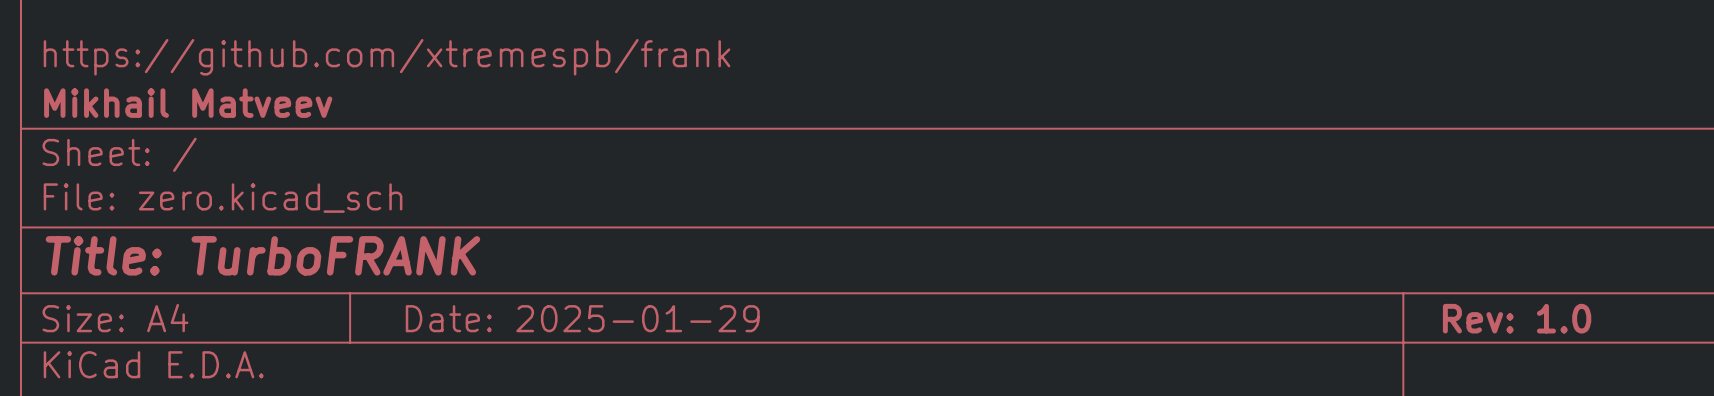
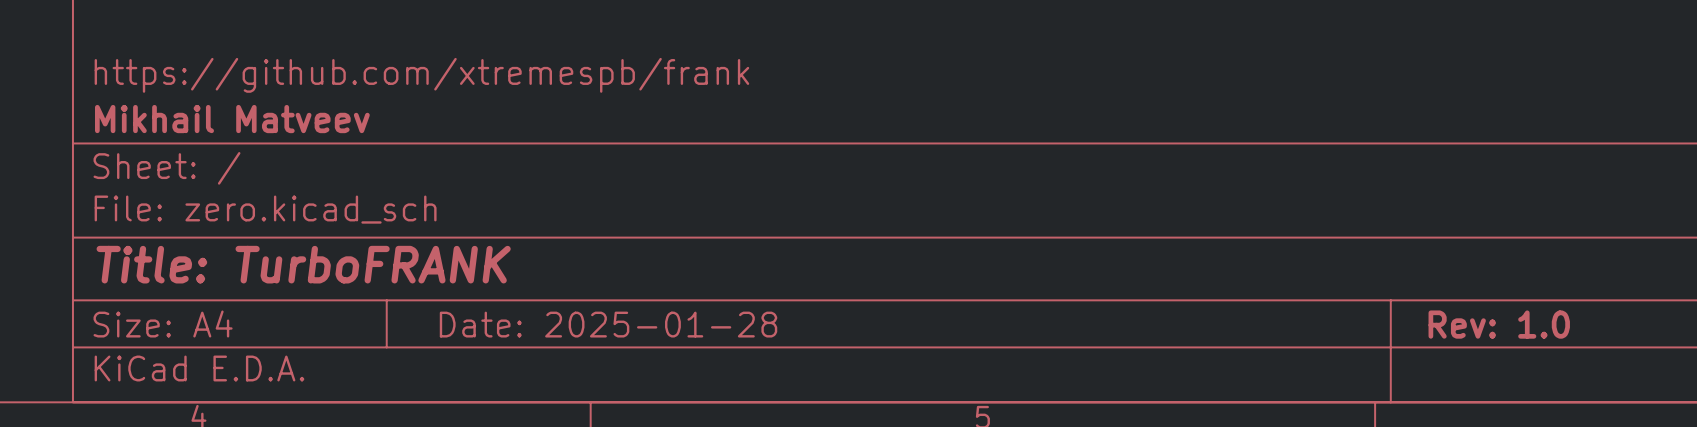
title block: Date: 2025-01-29 (582, 318) -> Date: 2025-01-28 (608, 324)

